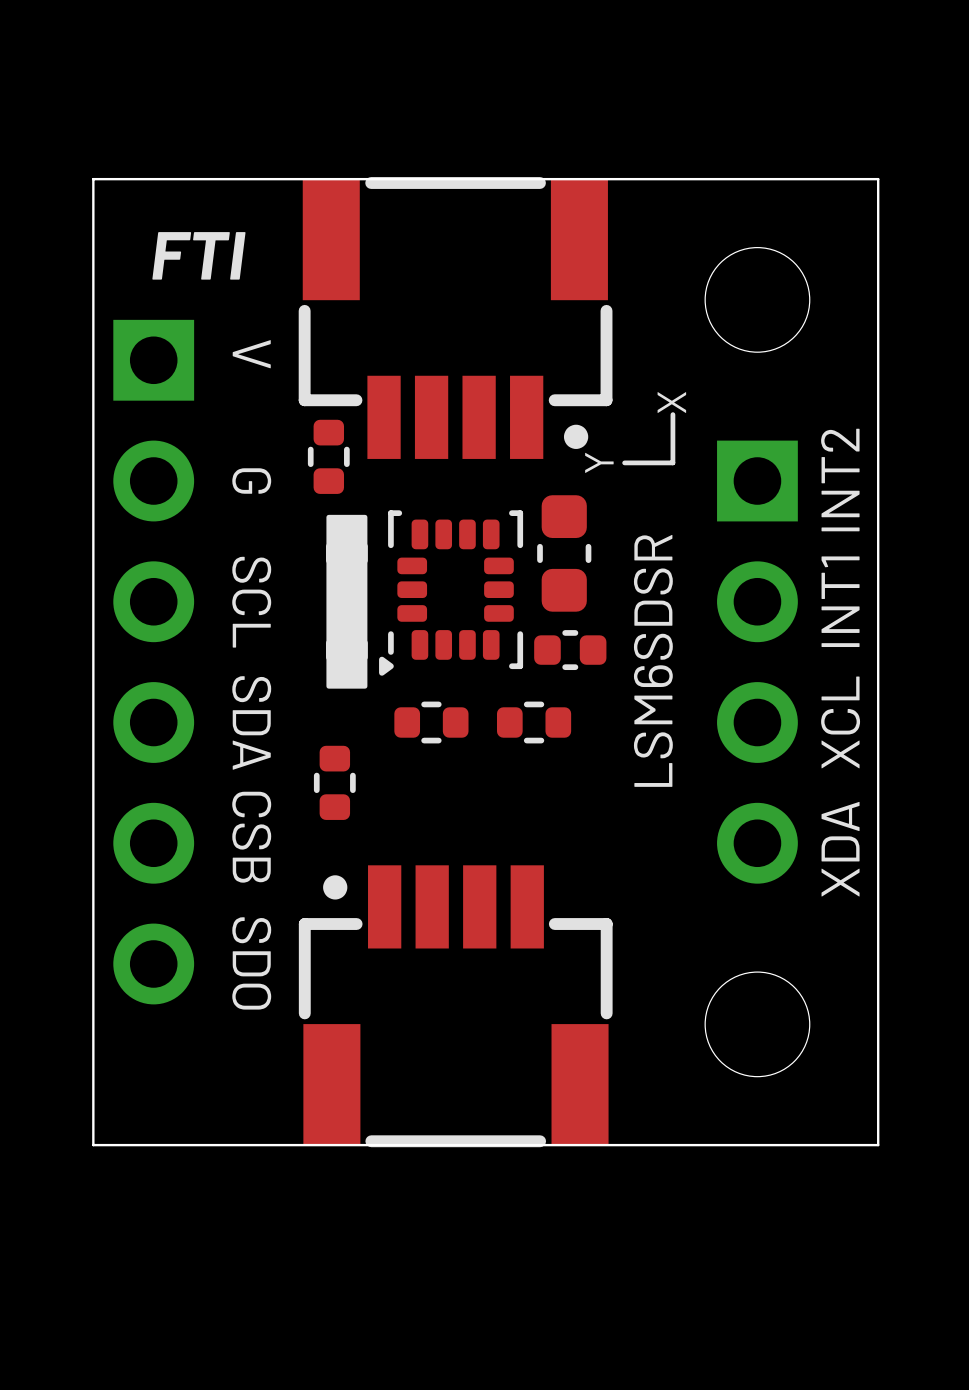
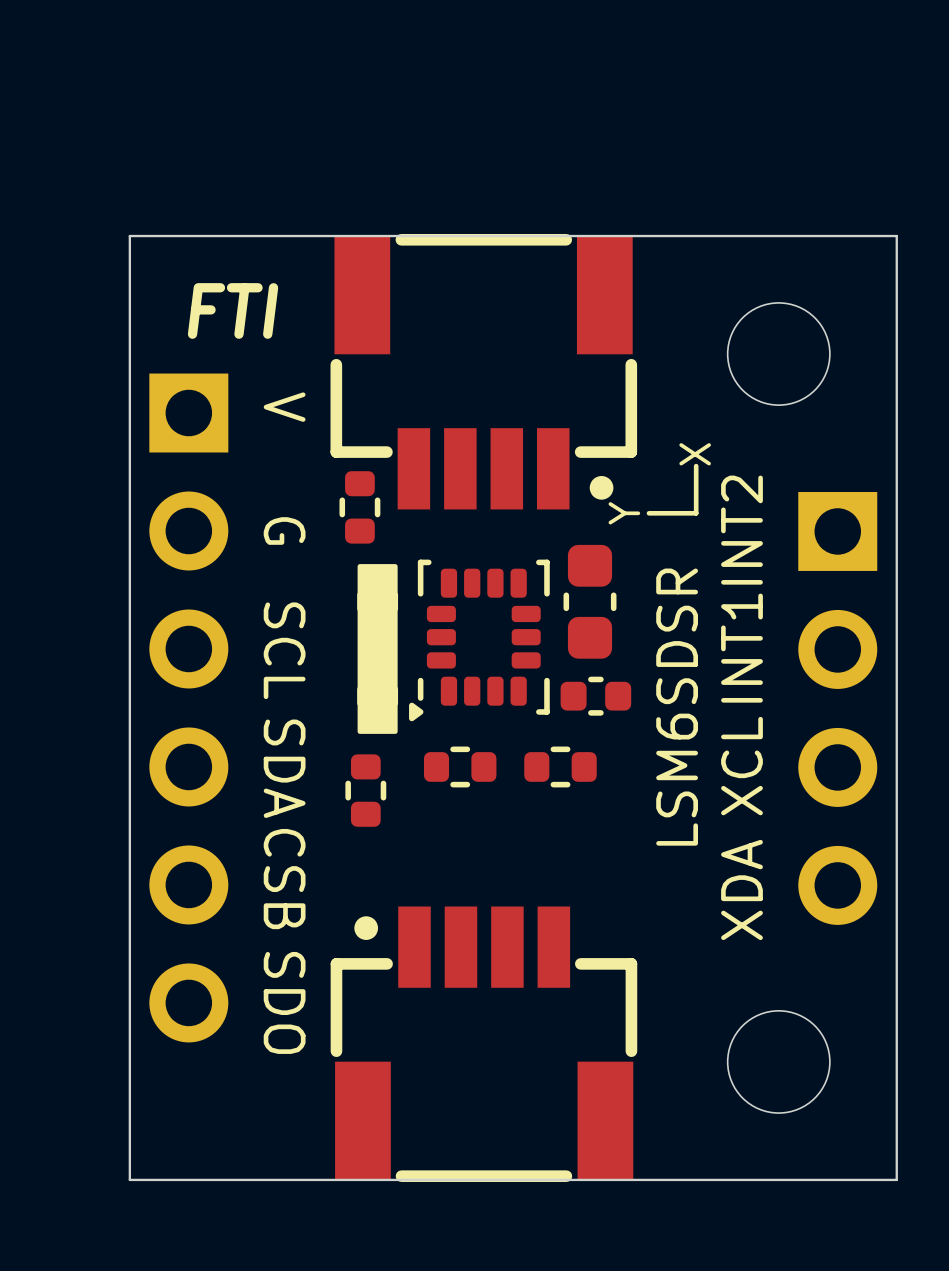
text position: INT2 (840, 480) -> INT2 (741, 530)
text position: INT1 (840, 601) -> INT1 (741, 648)
part position: (757, 662) -> (837, 708)
text position: XCL (840, 722) -> XCL (741, 766)
part position: (334, 782) -> (365, 790)
text position: XDA (840, 849) -> XDA (741, 889)

